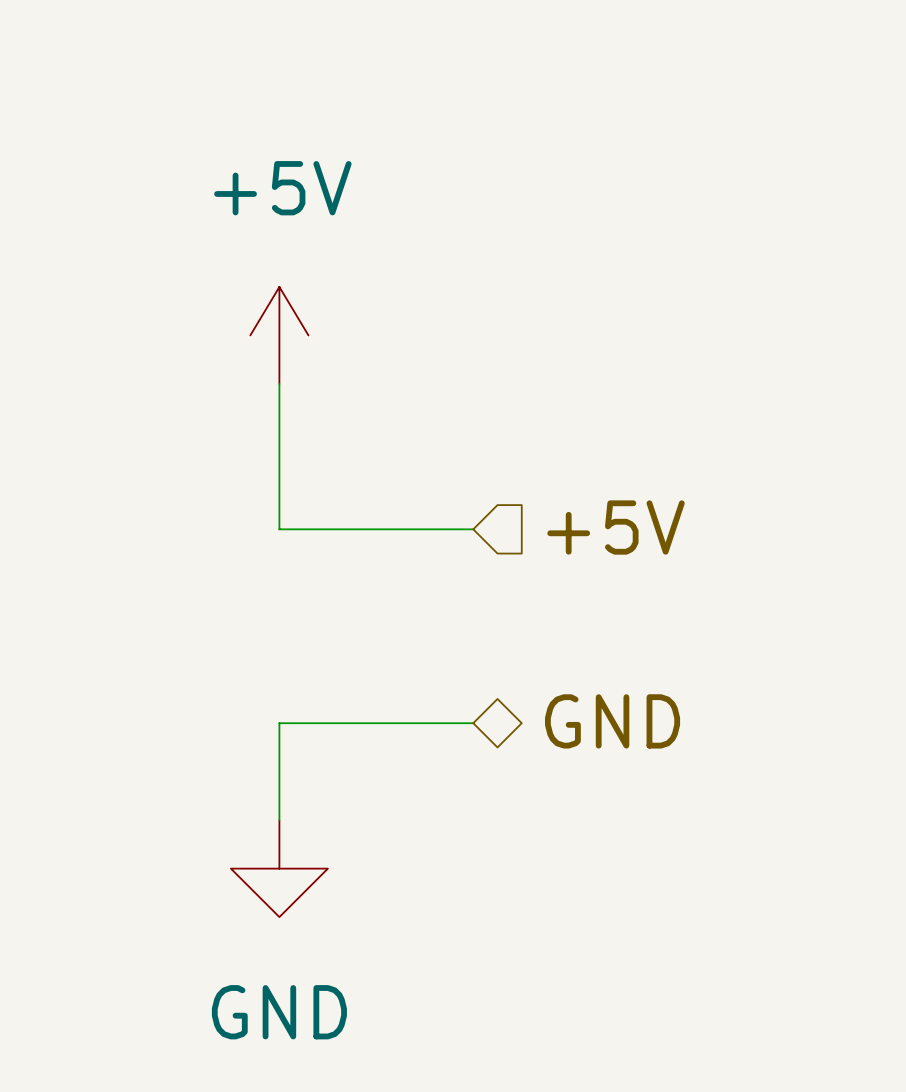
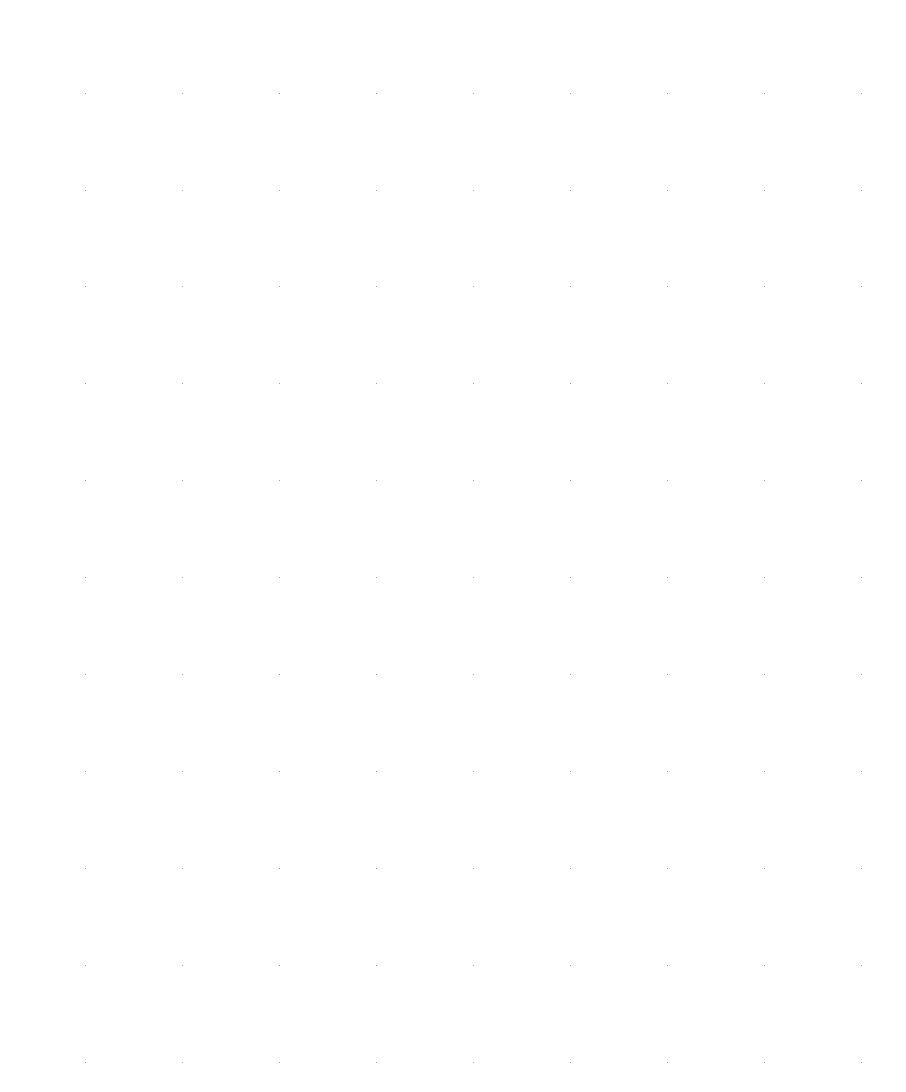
power symbol: +5V (279, 335) -> none
wire: (279, 383) (279, 529) (473, 529) -> none
hierarchical label: +5V (616, 527) -> none
hierarchical label: GND (612, 721) -> none
wire: (473, 723) (279, 723) (279, 820) -> none
power symbol: GND (279, 868) -> none

